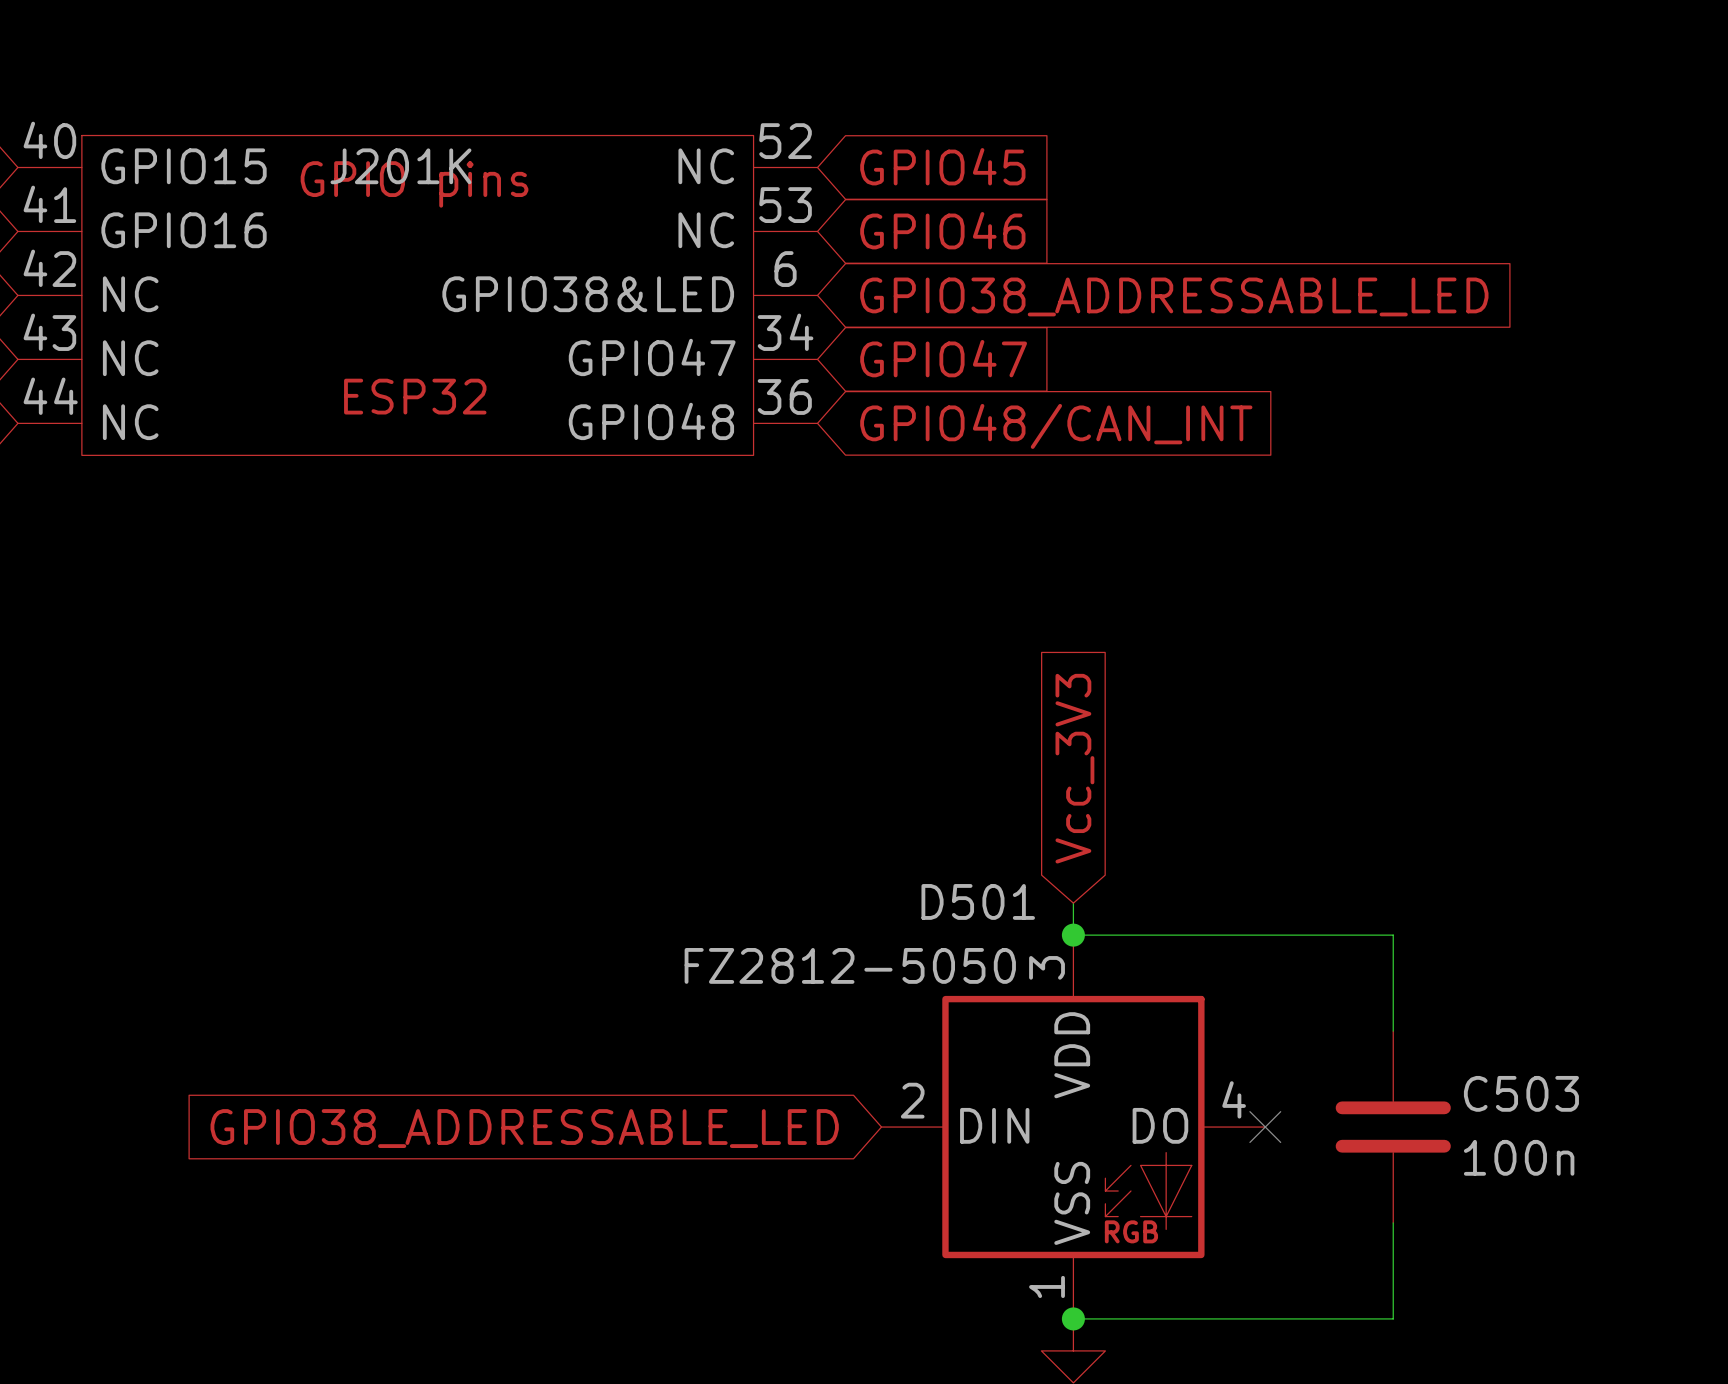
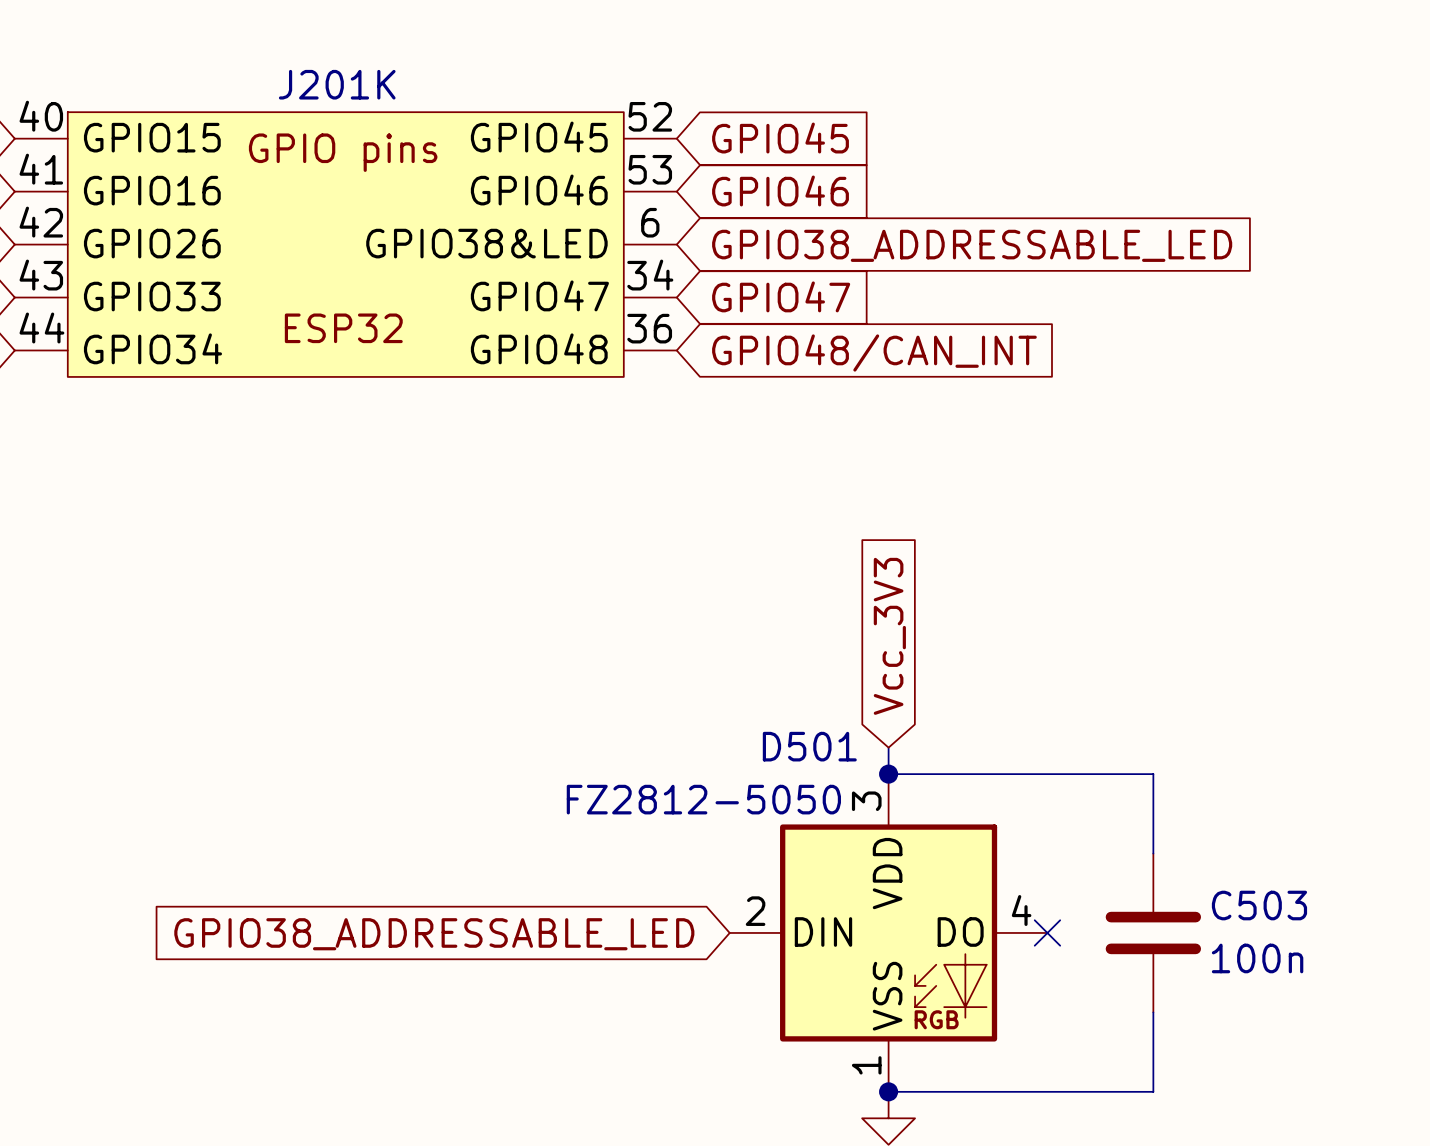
J201K name position: J201K (400, 166) -> J201K (337, 84)
J201K pin name: NC (706, 166) -> GPIO45 (539, 137)
J201K pin name: NC (706, 230) -> GPIO46 (539, 189)
J201K pin name: NC (130, 294) -> GPIO26 (152, 243)
J201K pin name: NC (130, 358) -> GPIO33 (152, 296)
J201K pin name: NC (130, 422) -> GPIO34 (152, 348)

